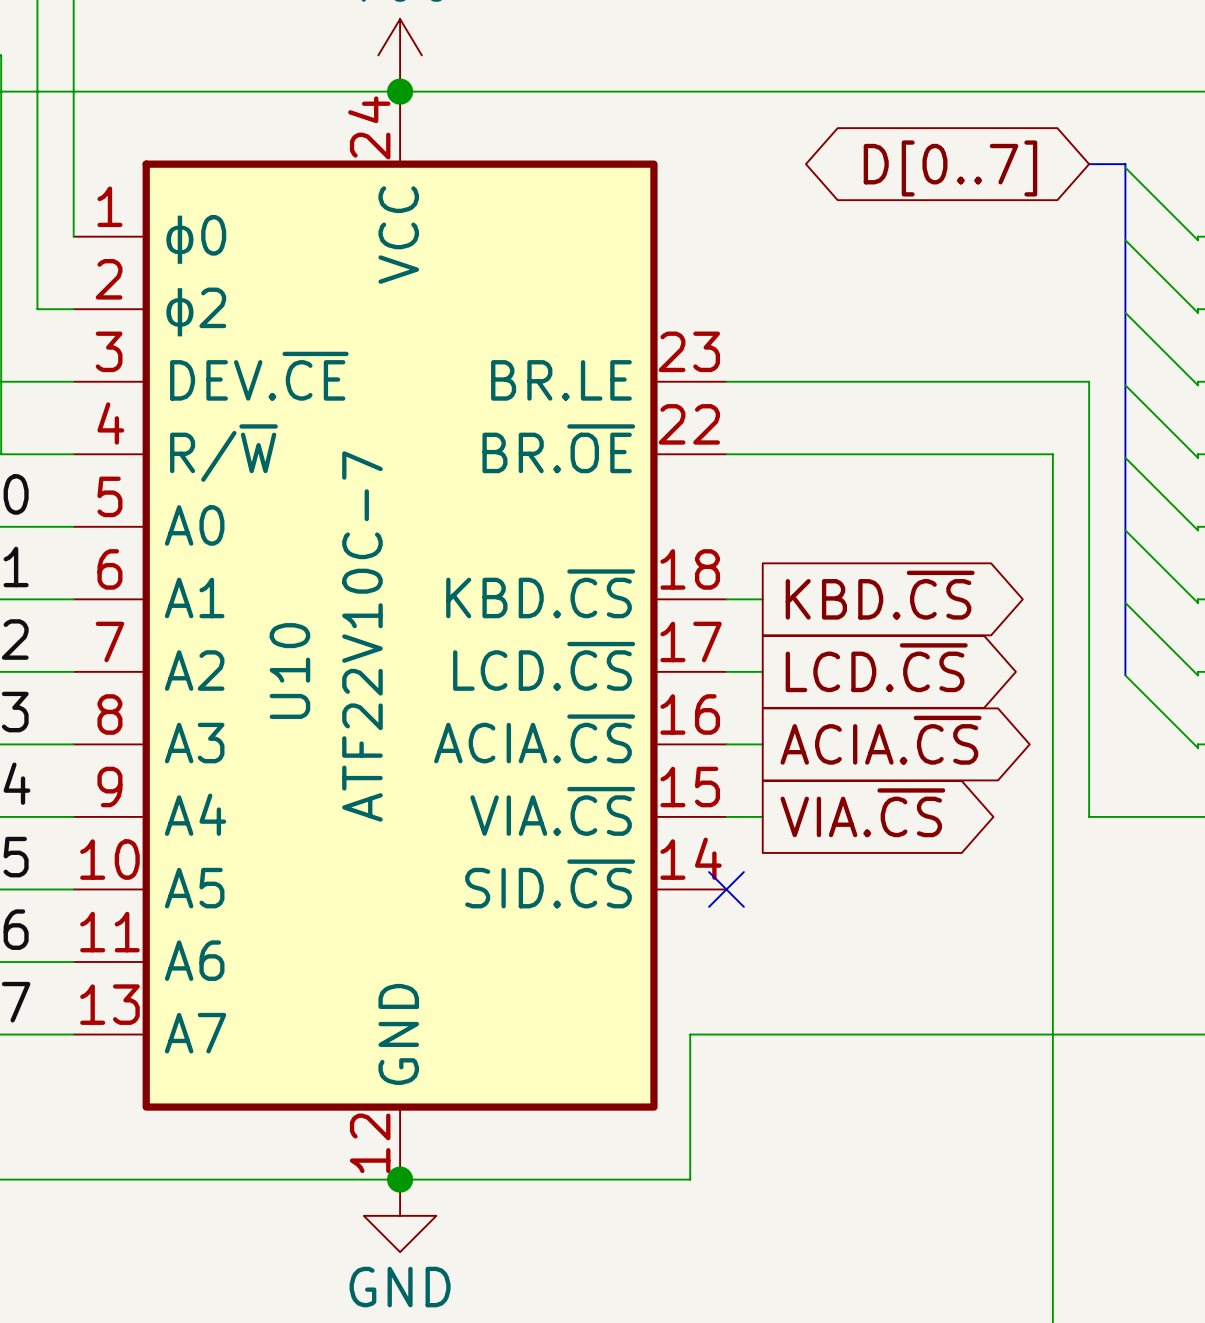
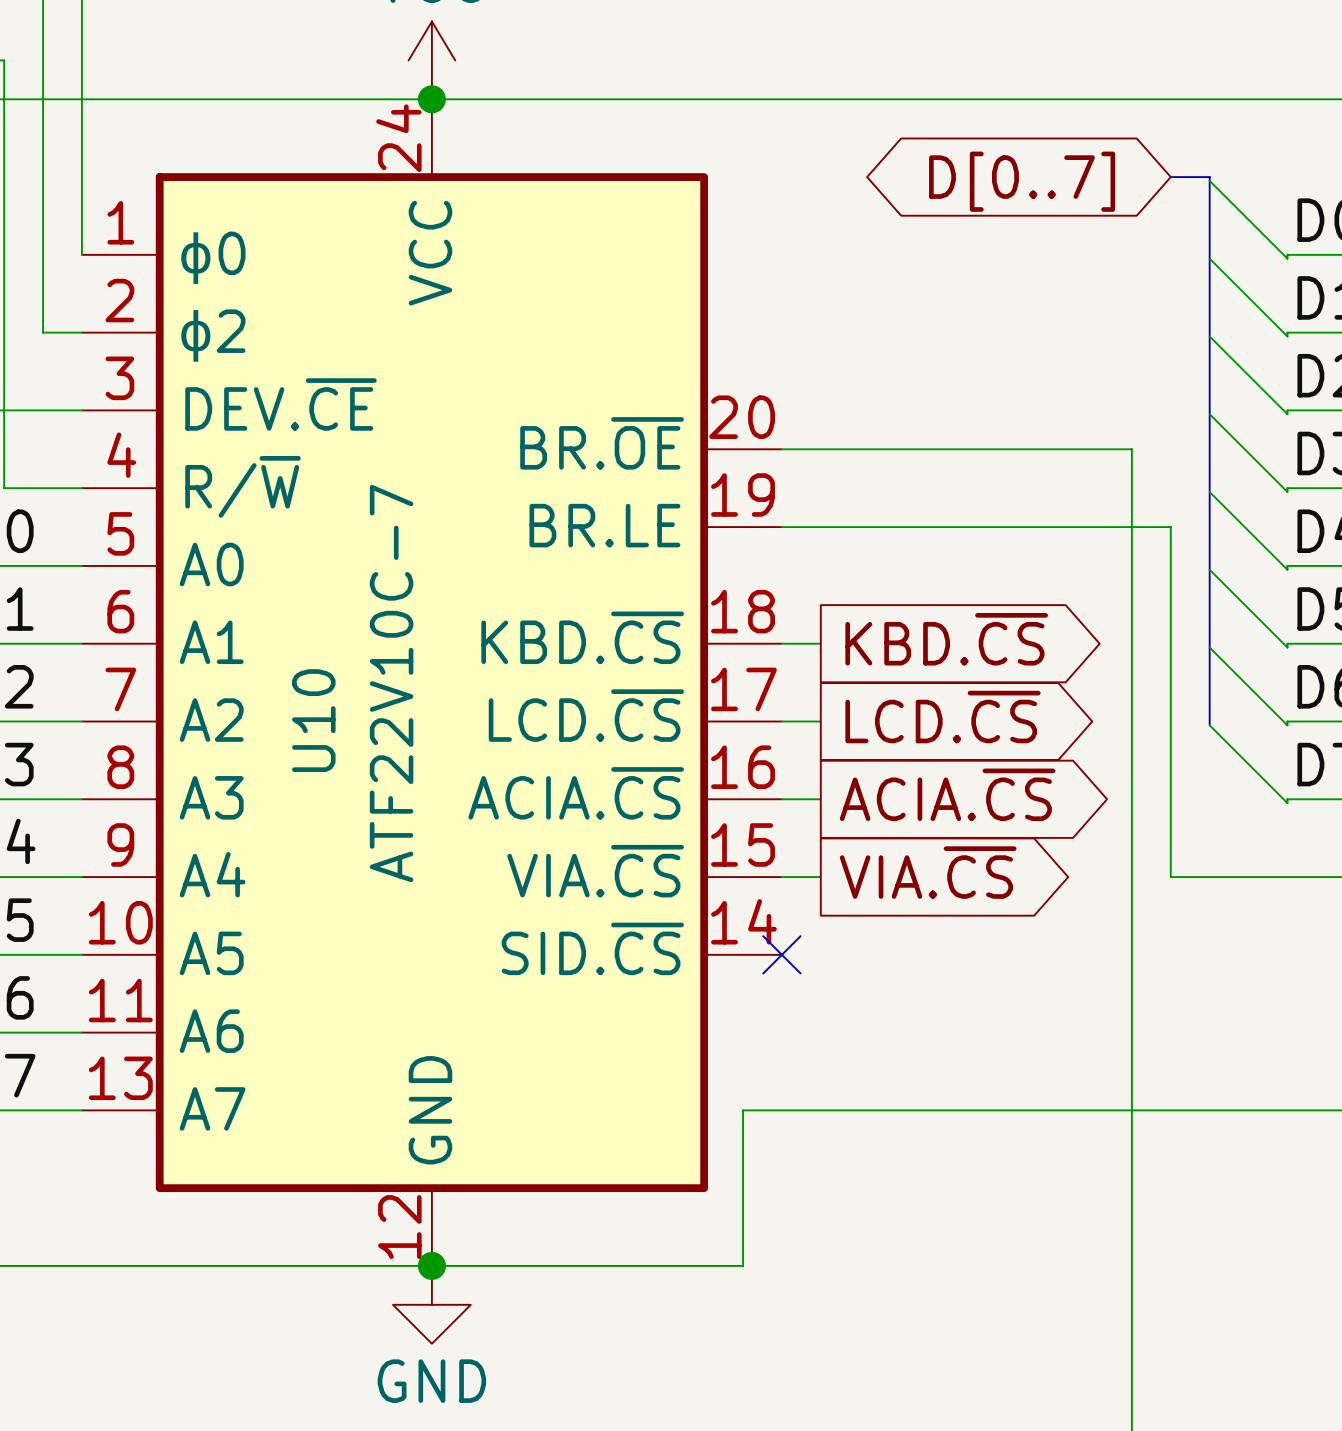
U10 symbol: [73, 91, 727, 1180] -> [81, 99, 782, 1266]
wire: (726, 381) (1089, 381) (1089, 490) -> (781, 527) (1170, 527)
wire: (726, 454) (1052, 454) -> (781, 449) (1131, 449) (1131, 488)

